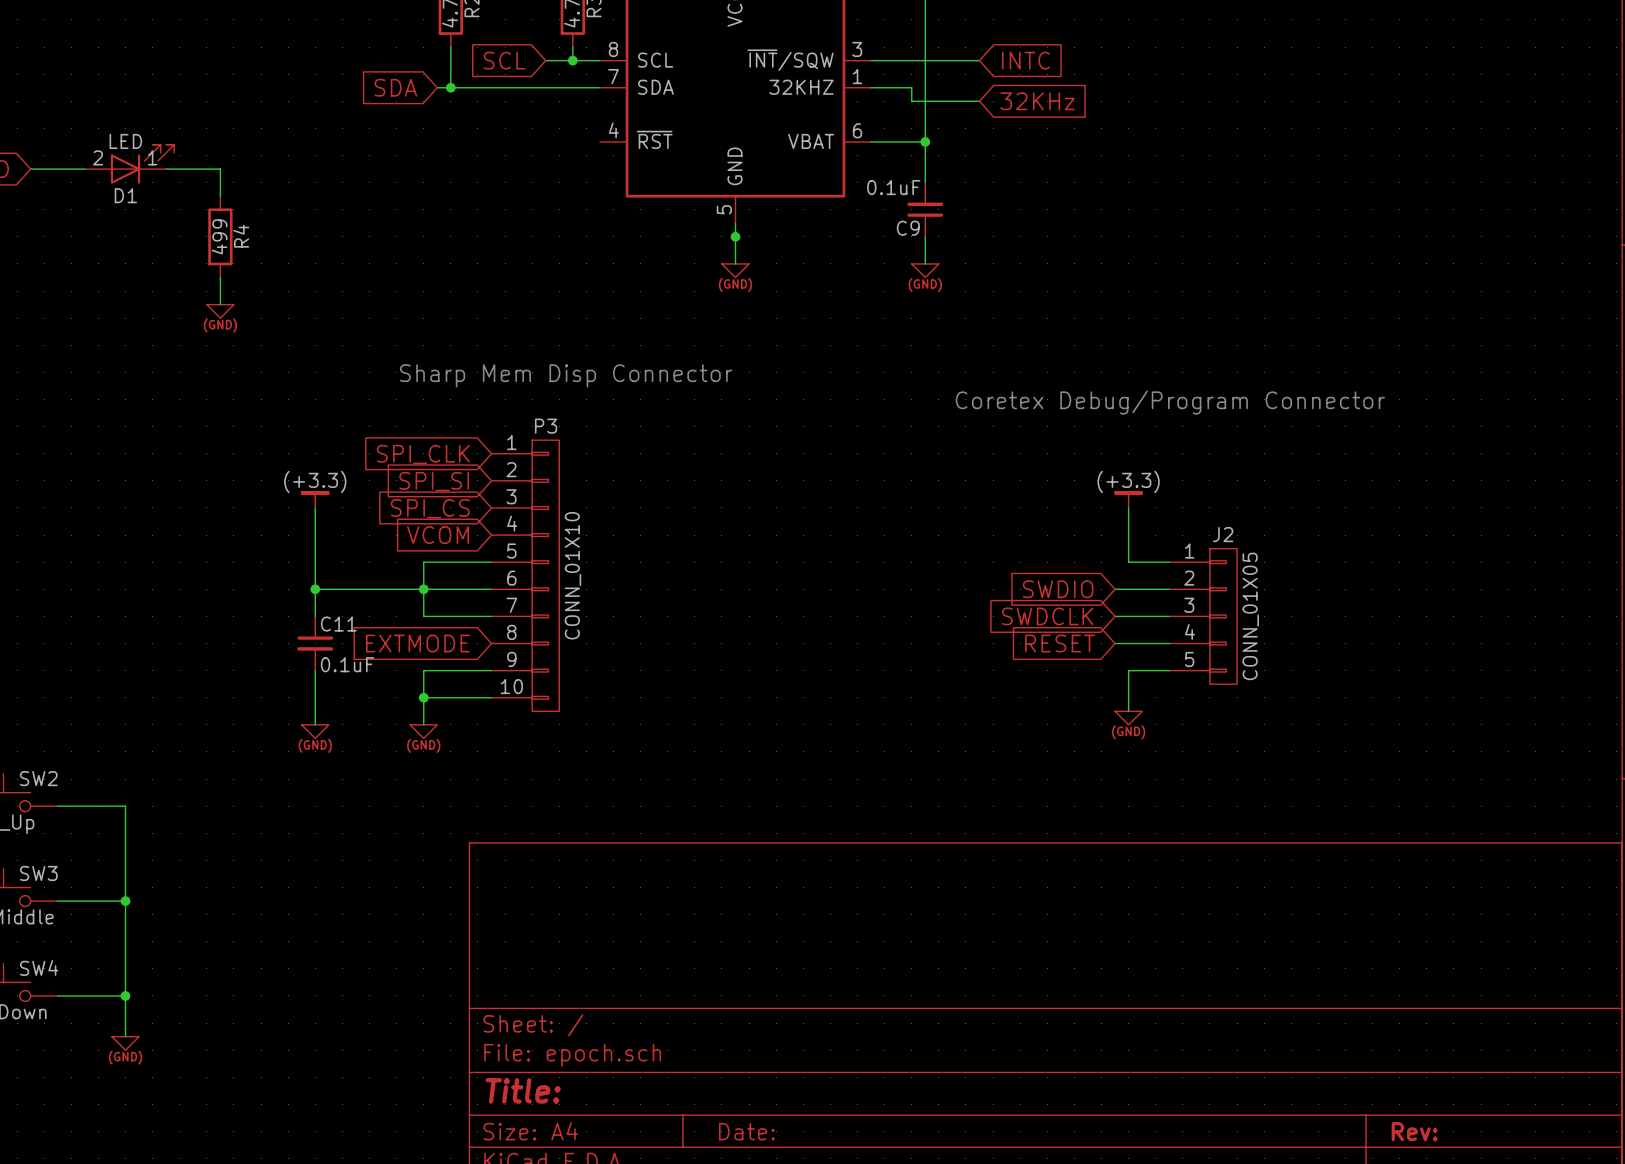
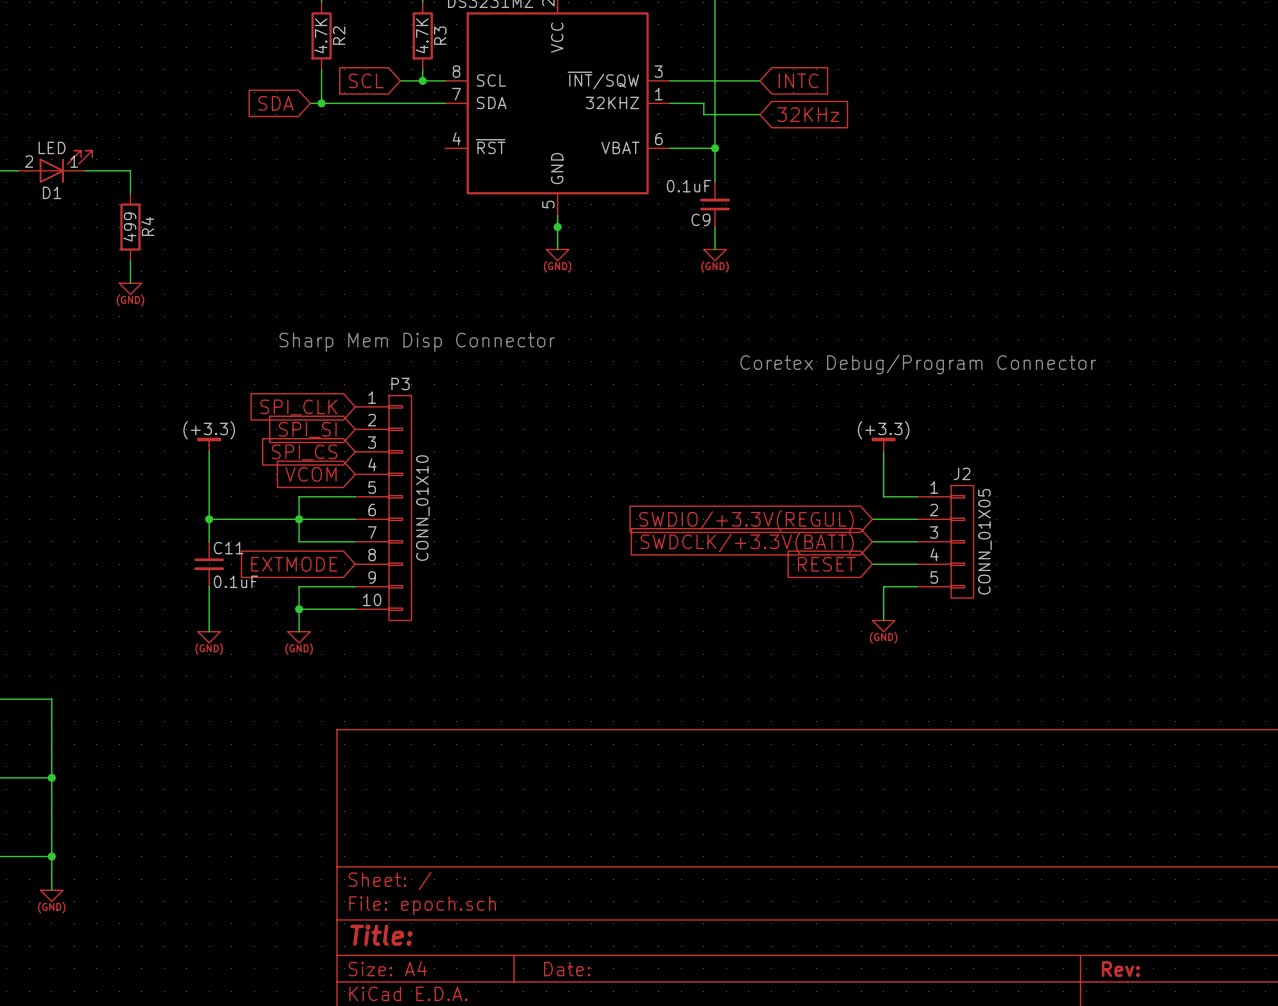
global label: SWDIO (1058, 589) -> SWDIO/+3.3V(REGUL) (746, 520)
global label: SWDCLK (1047, 616) -> SWDCLK/+3.3V(BATT) (747, 543)

